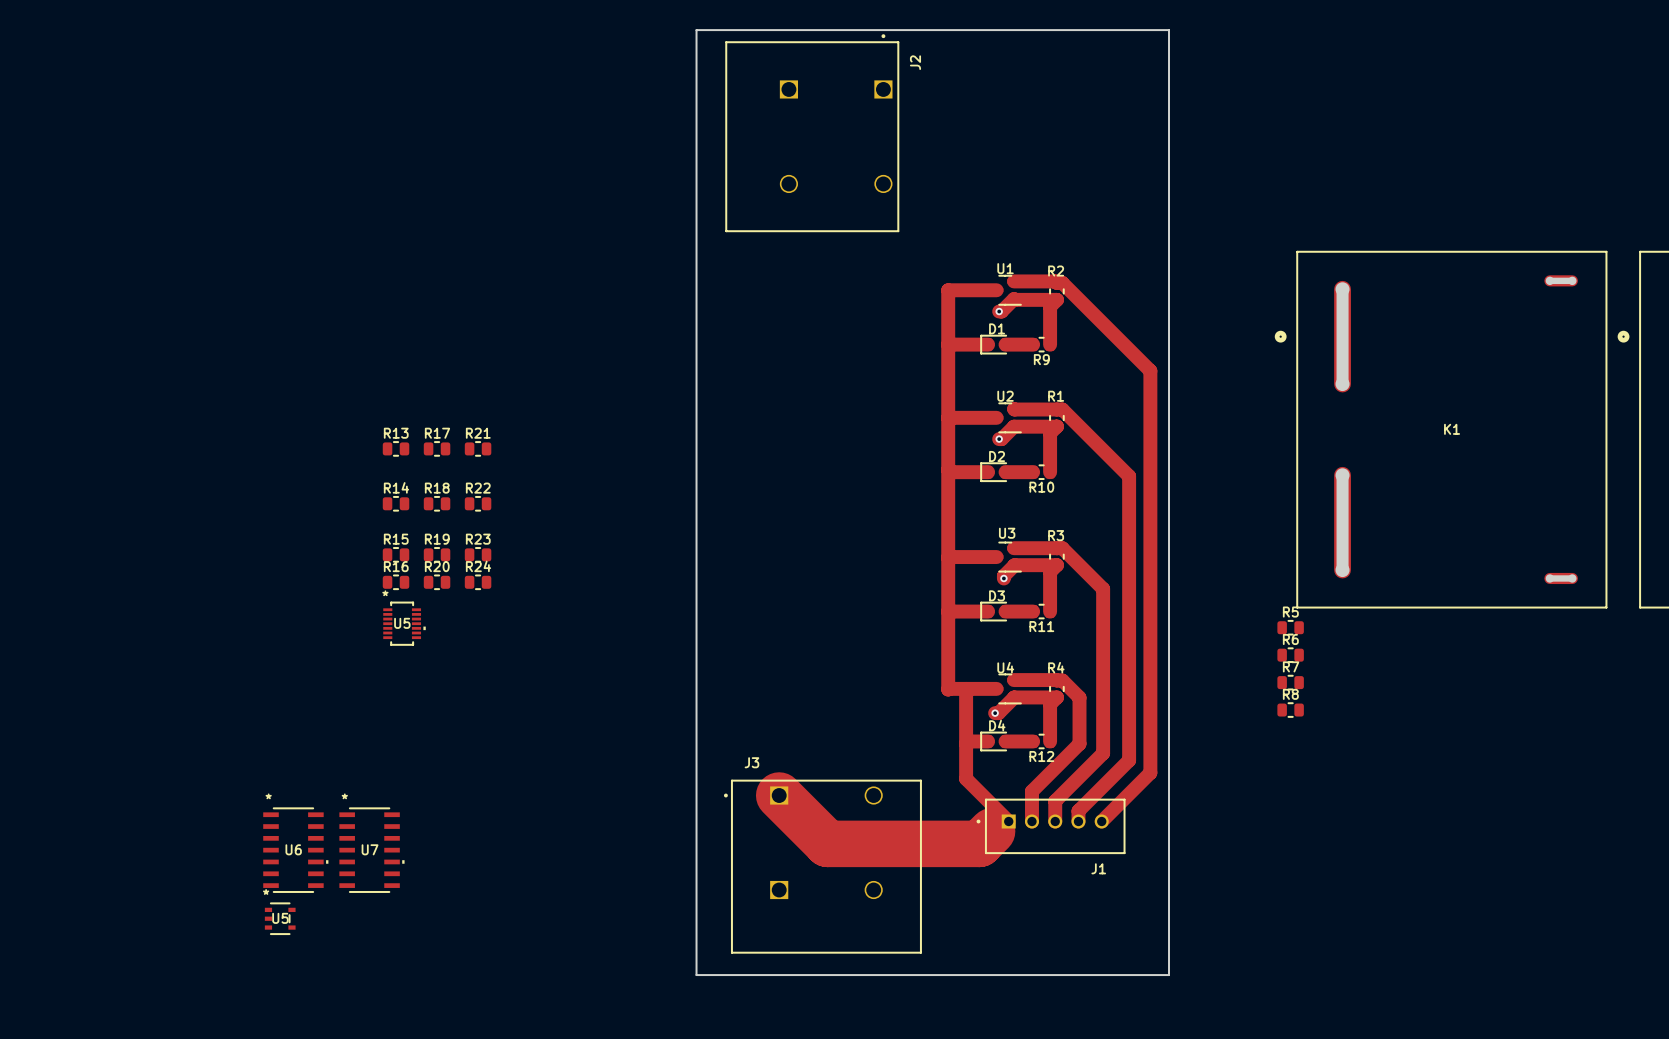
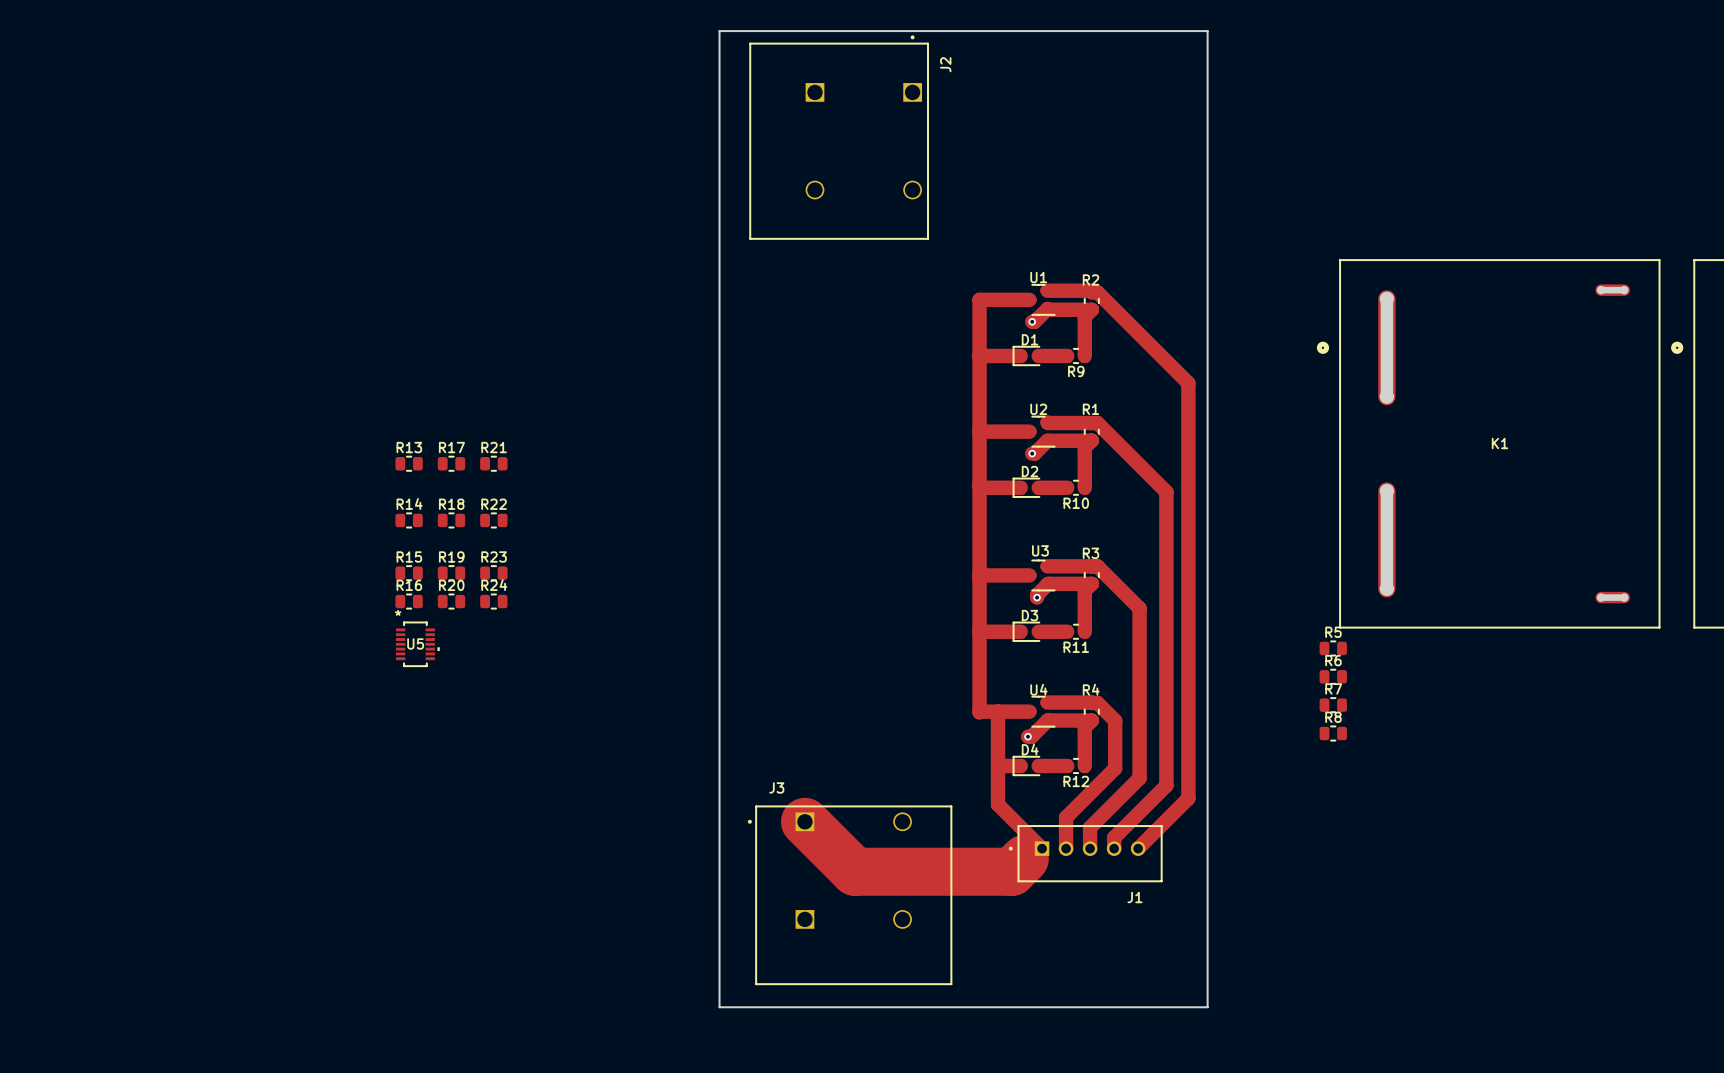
U6: (295, 850) -> none
U7: (371, 850) -> none
U5: (280, 918) -> none

